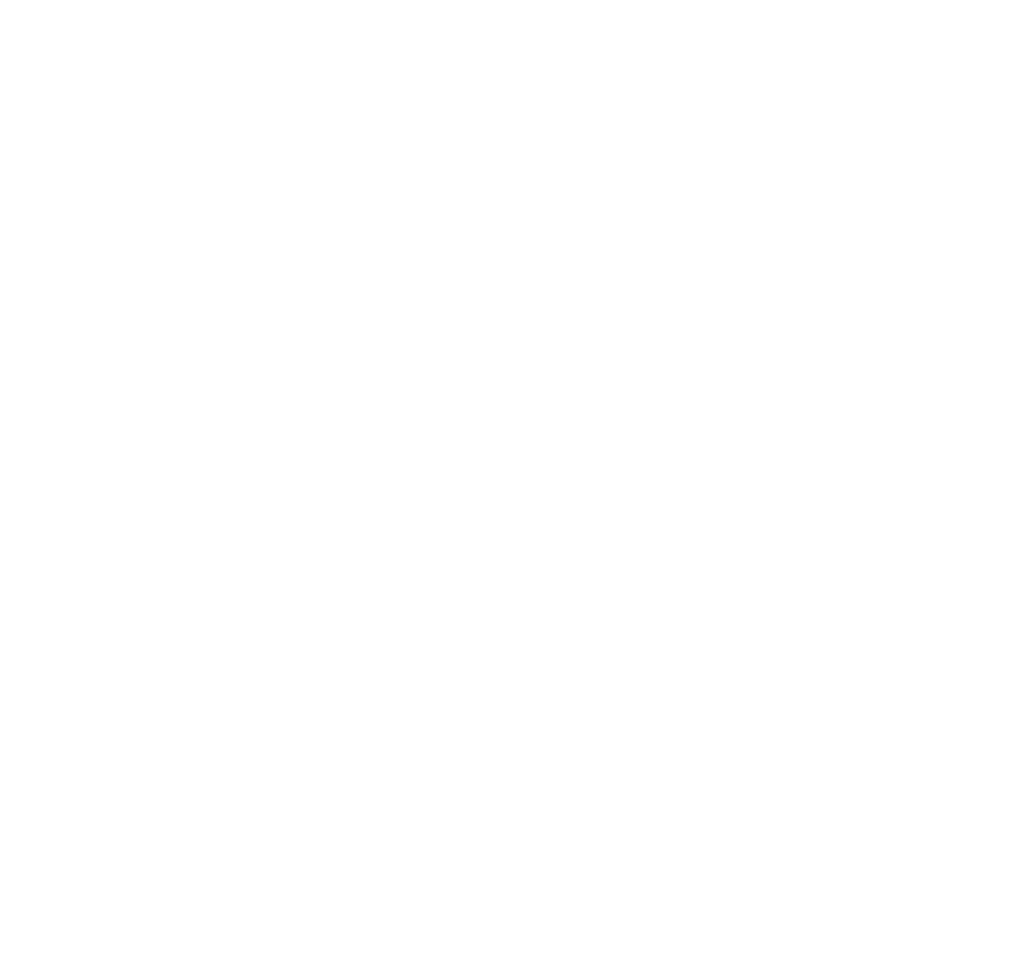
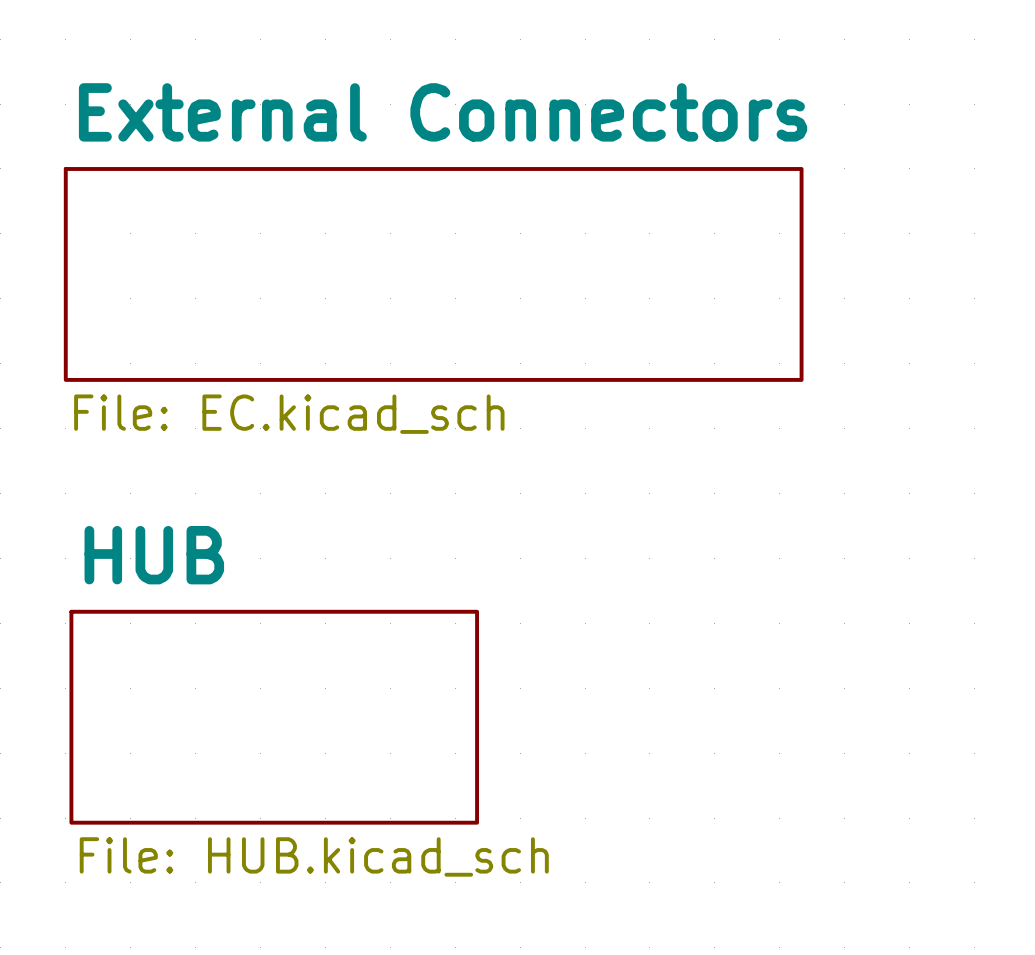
sheet External Connectors: none -> File: EC.kicad_sch (433, 274)
sheet HUB: none -> File: HUB.kicad_sch (274, 717)

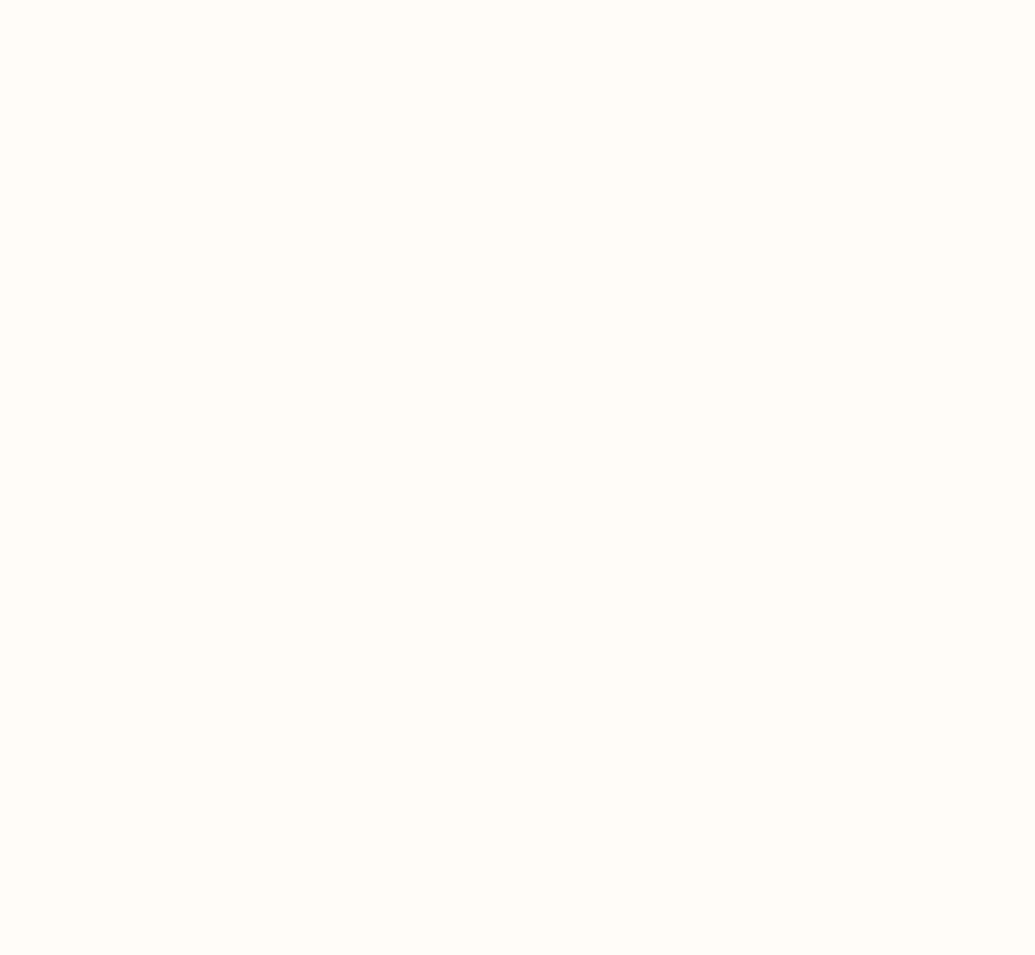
sheet External Connectors: File: EC.kicad_sch (433, 274) -> none
sheet HUB: File: HUB.kicad_sch (274, 717) -> none

